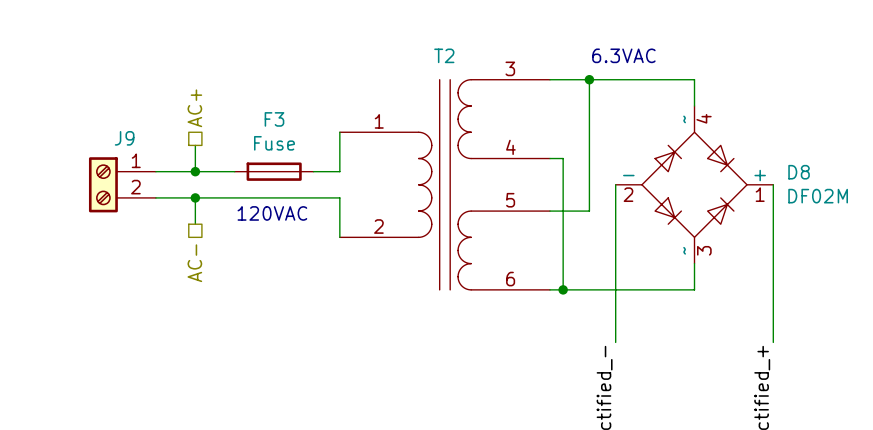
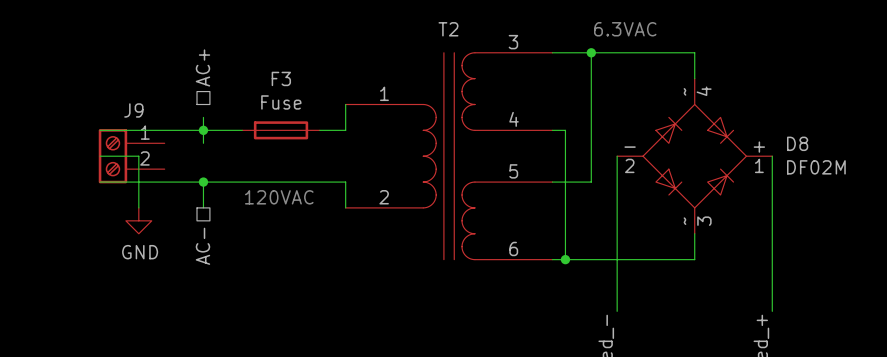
hierarchical label position: AC+ (194, 108) -> AC+ (202, 67)
wire: none -> (100, 130) (242, 130)
wire: (339, 158) (339, 171) (313, 171) -> (345, 130) (319, 130)
wire: (155, 171) (234, 171) -> none
junction position: (195, 171) -> (203, 130)
F3 position: (274, 171) -> (281, 130)
wire: none -> (100, 156) (138, 156) (138, 207)
wire: (155, 197) (339, 197) (339, 211) -> (100, 182) (345, 182)
wire: (195, 197) (195, 211) -> (203, 194) (203, 207)
junction position: (195, 197) -> (203, 182)
text position: 120VAC (272, 213) -> 120VAC (279, 197)
power symbol: none -> GND (138, 220)
hierarchical label position: AC- (194, 263) -> AC- (202, 246)

